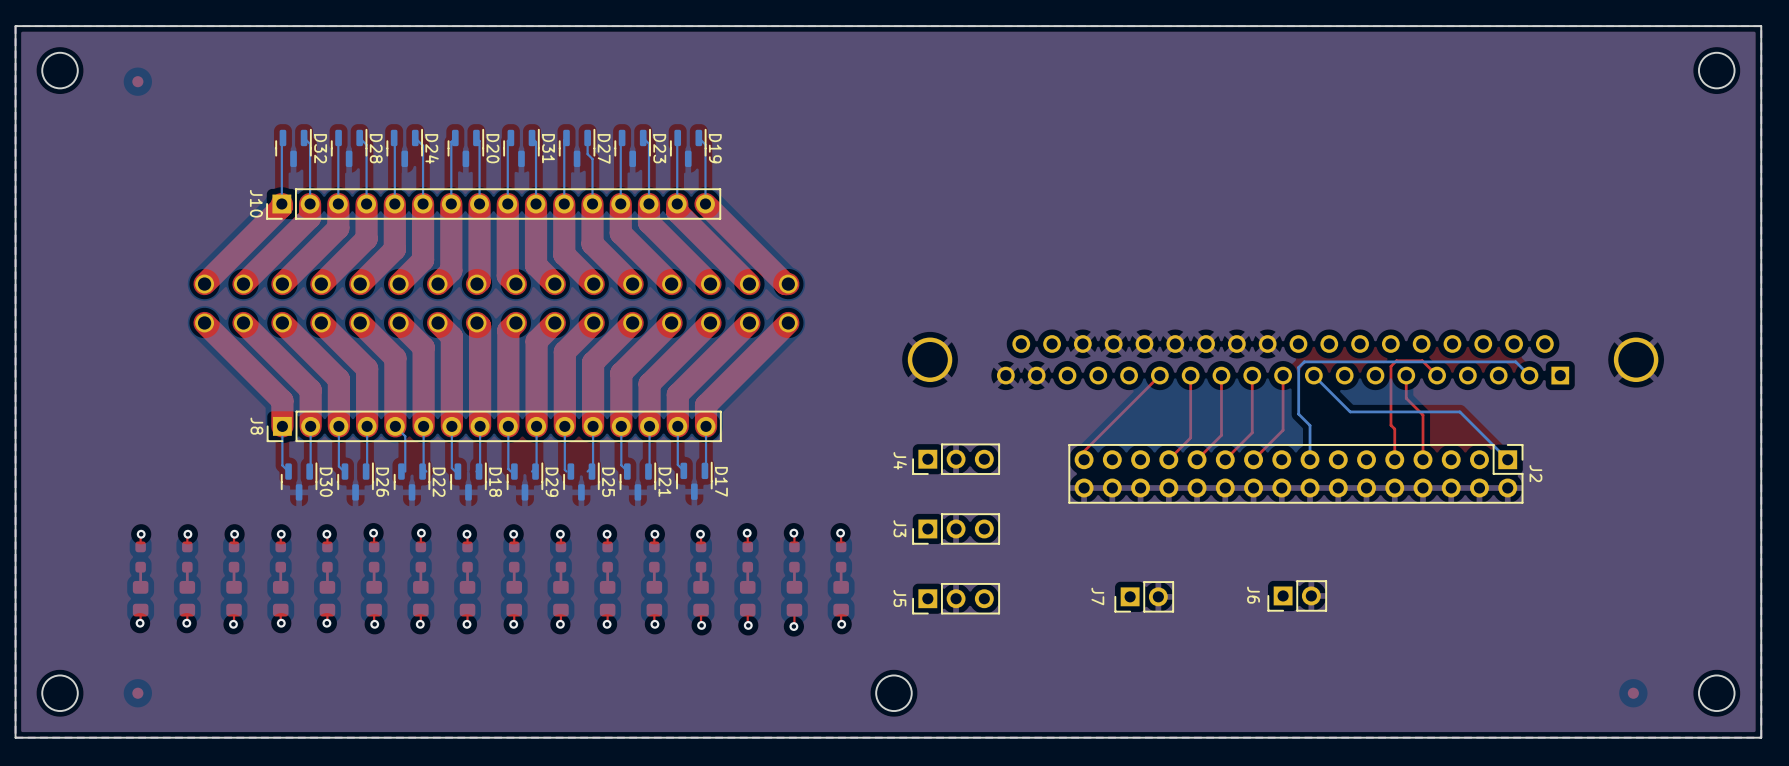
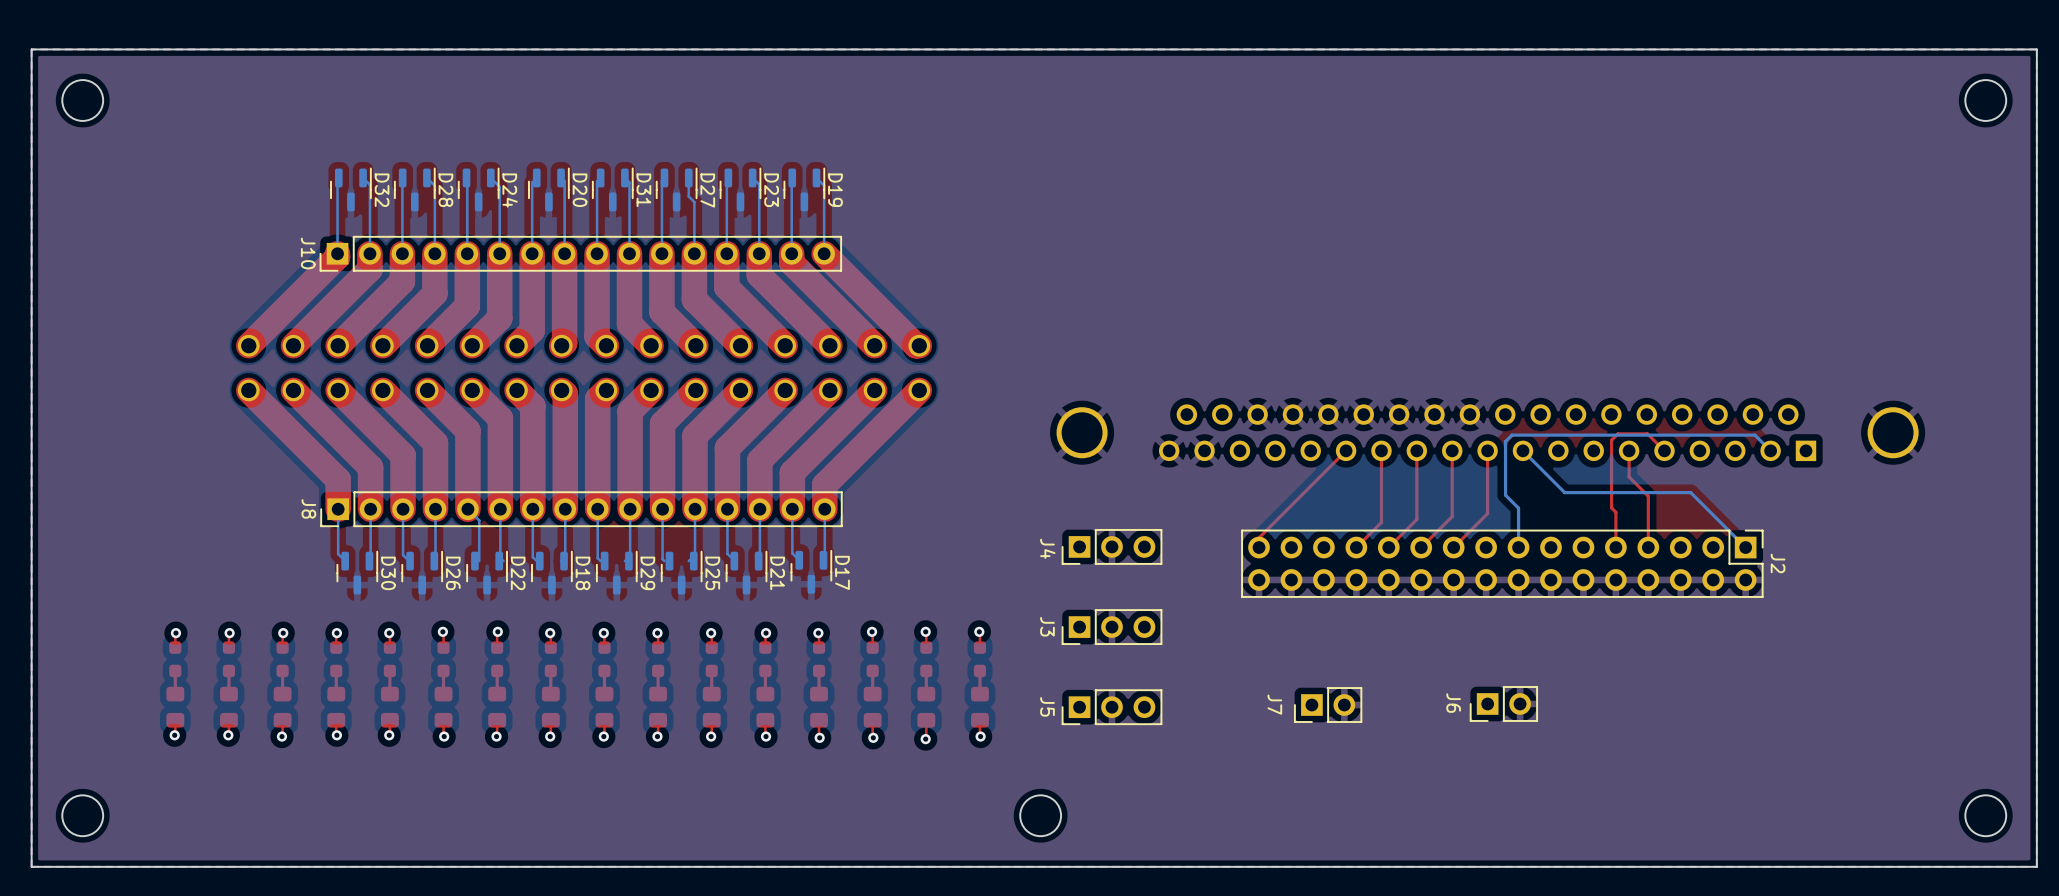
part: (137, 81) -> none
part: (137, 693) -> none
part: (1633, 693) -> none

